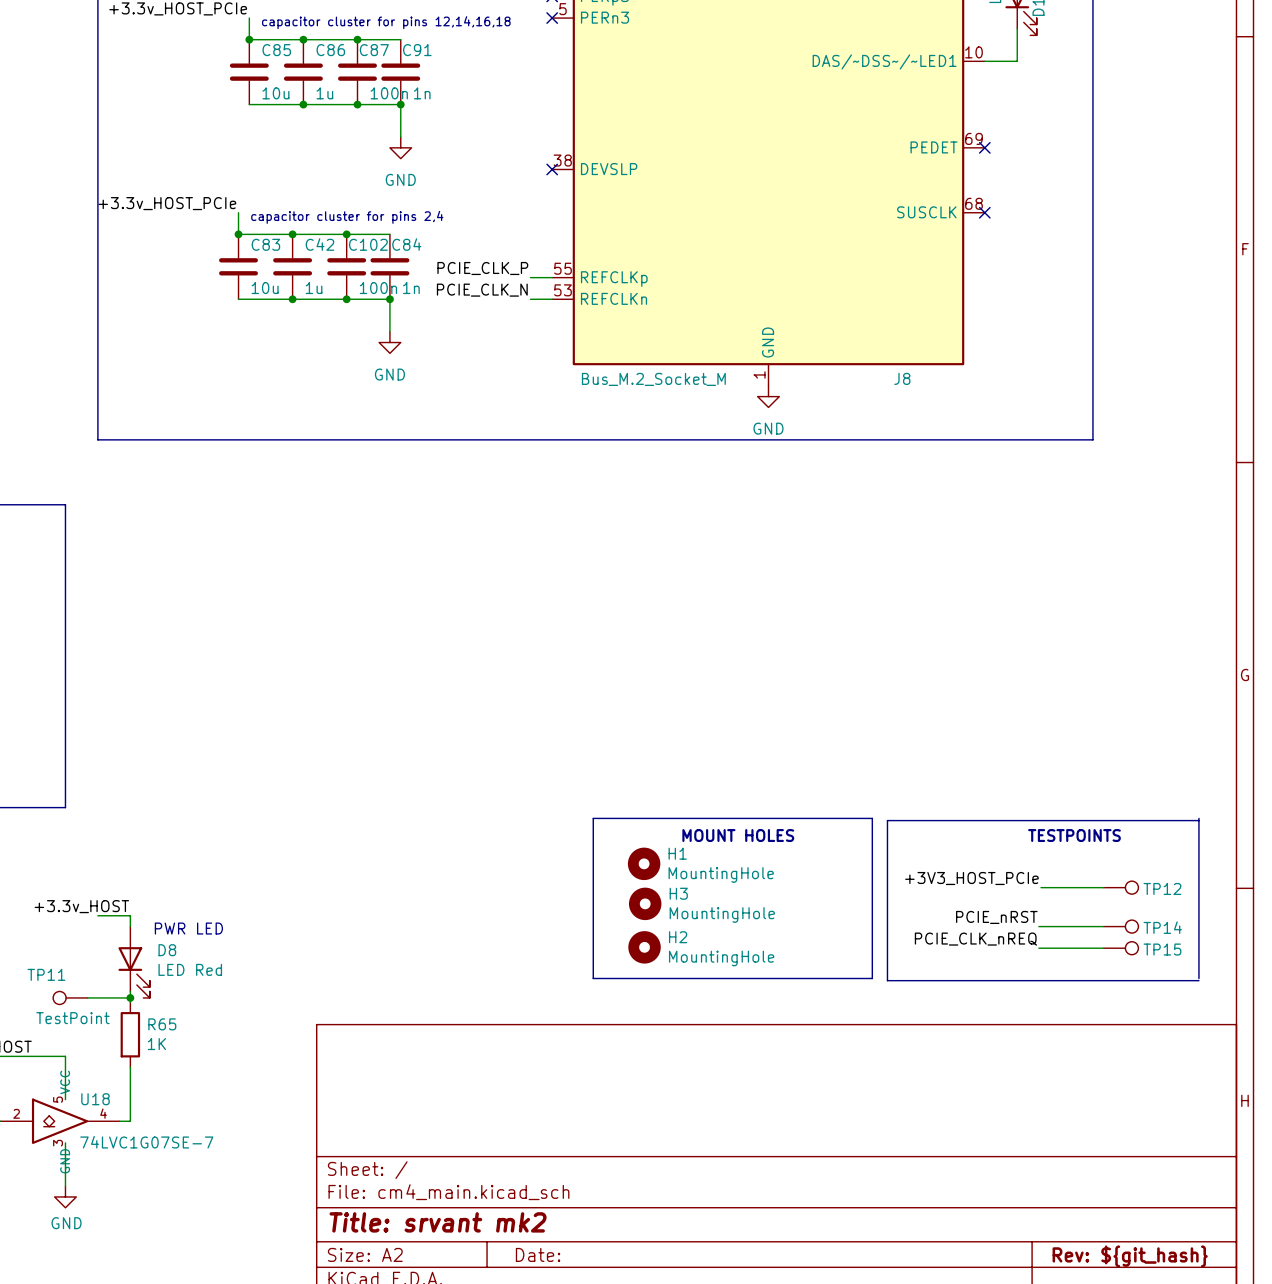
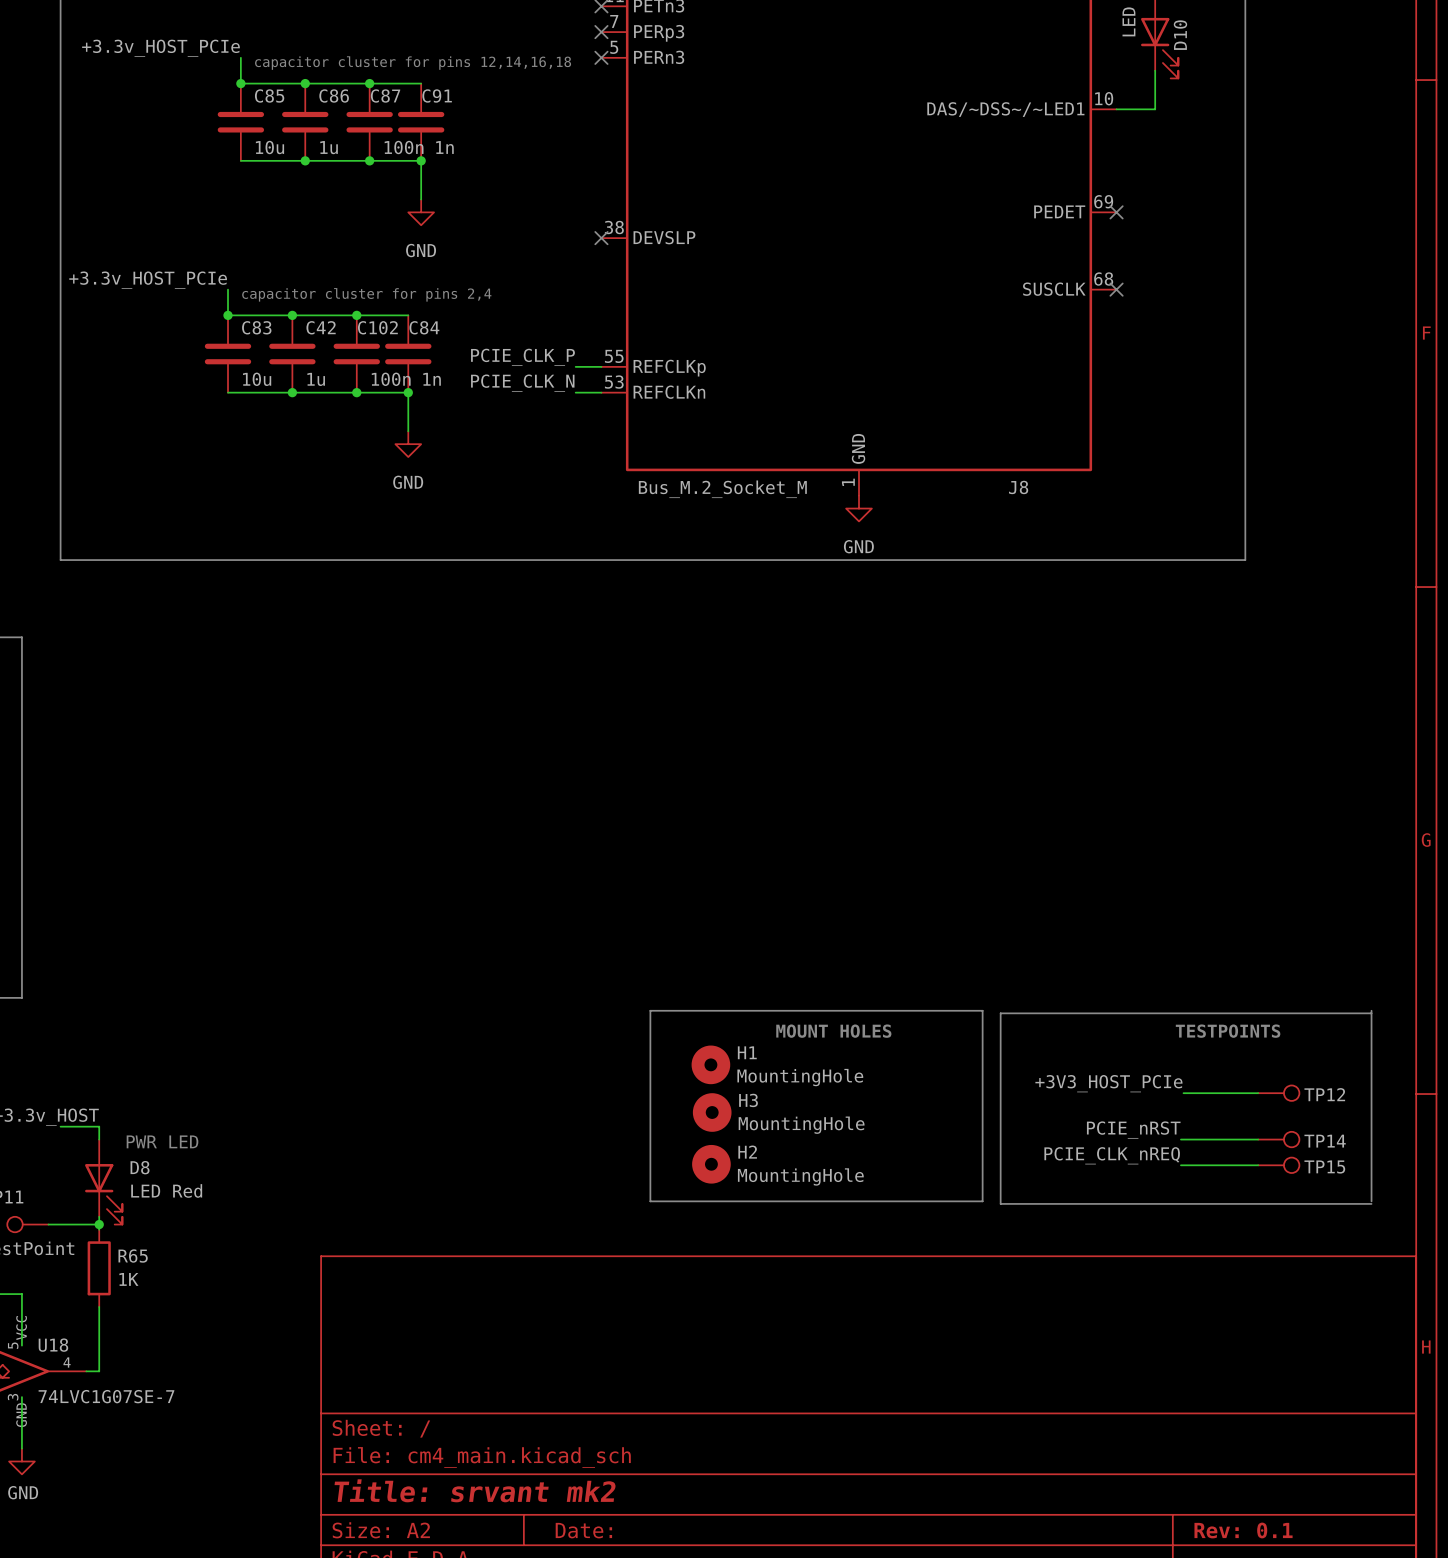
title block: Rev: ${git_hash} (1130, 1256) -> Rev: 0.1 (1243, 1530)

